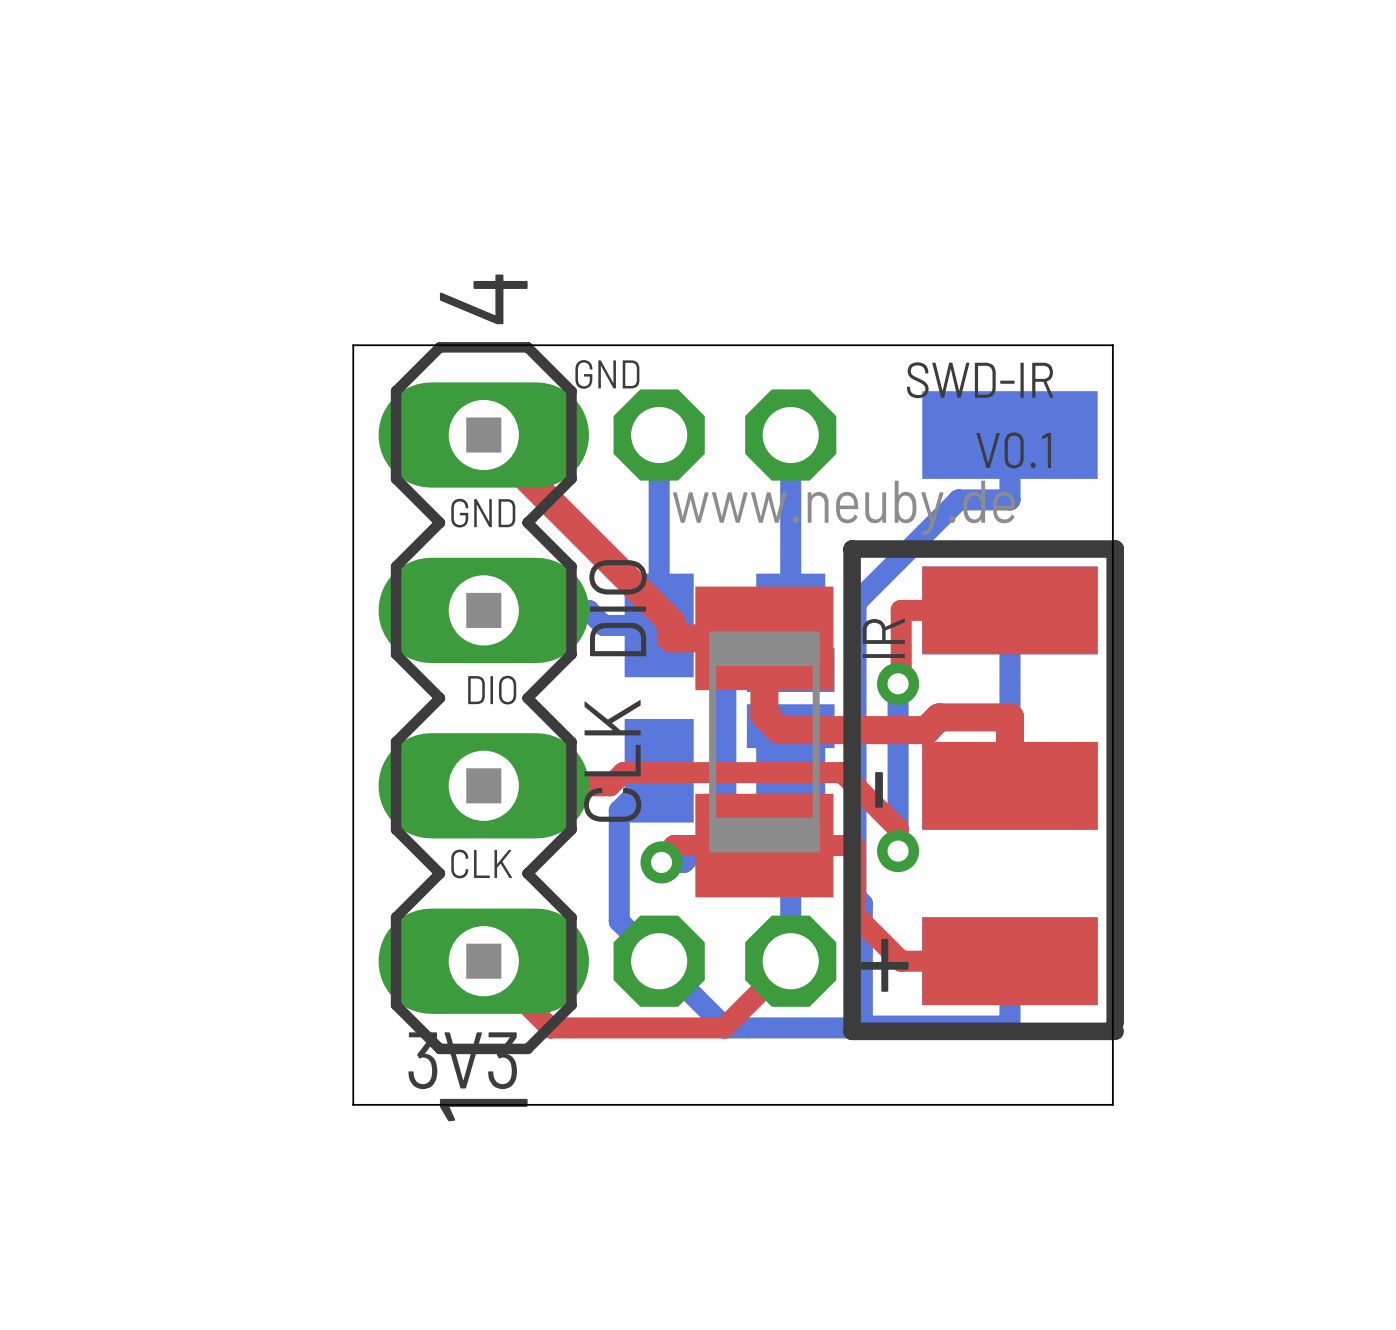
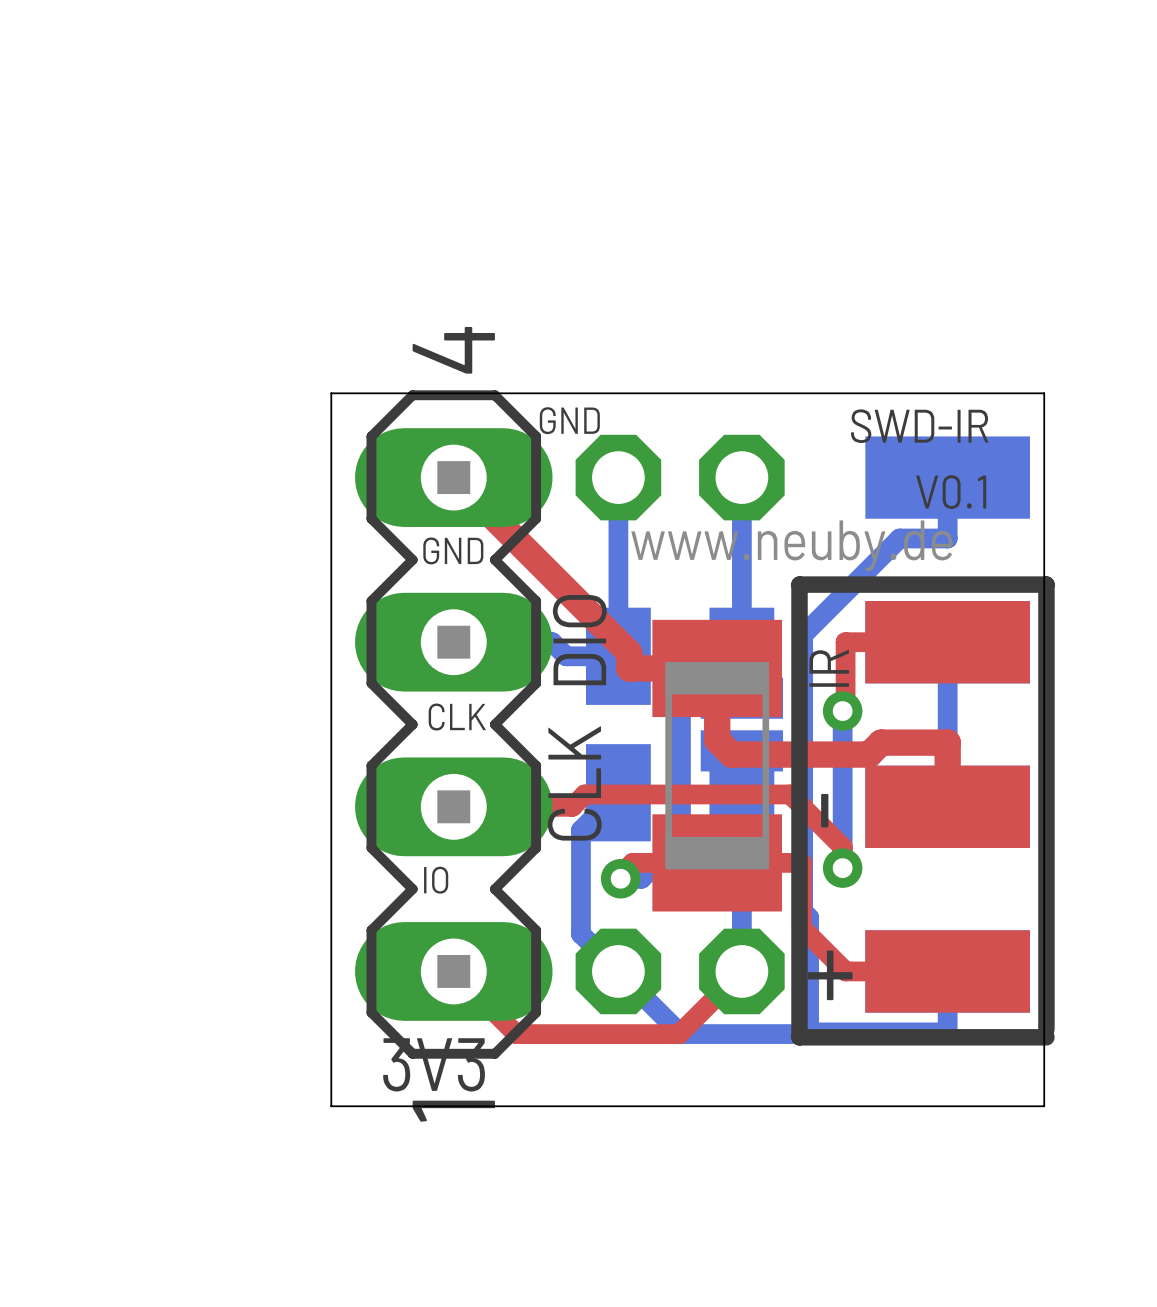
text: DIO (492, 690) -> CLK (457, 717)
text: CLK (481, 863) -> IO (436, 880)

